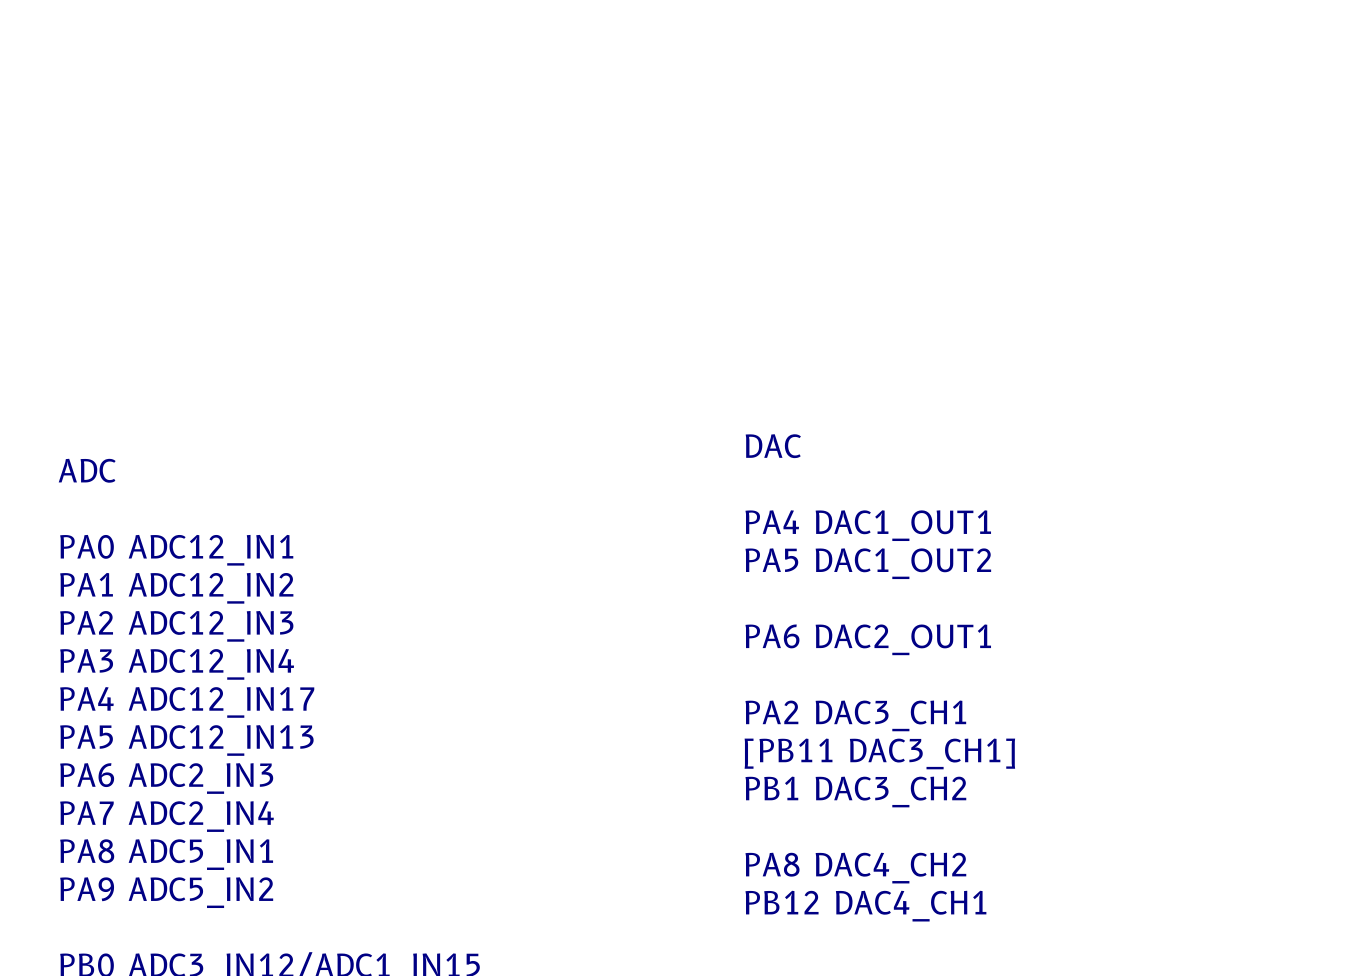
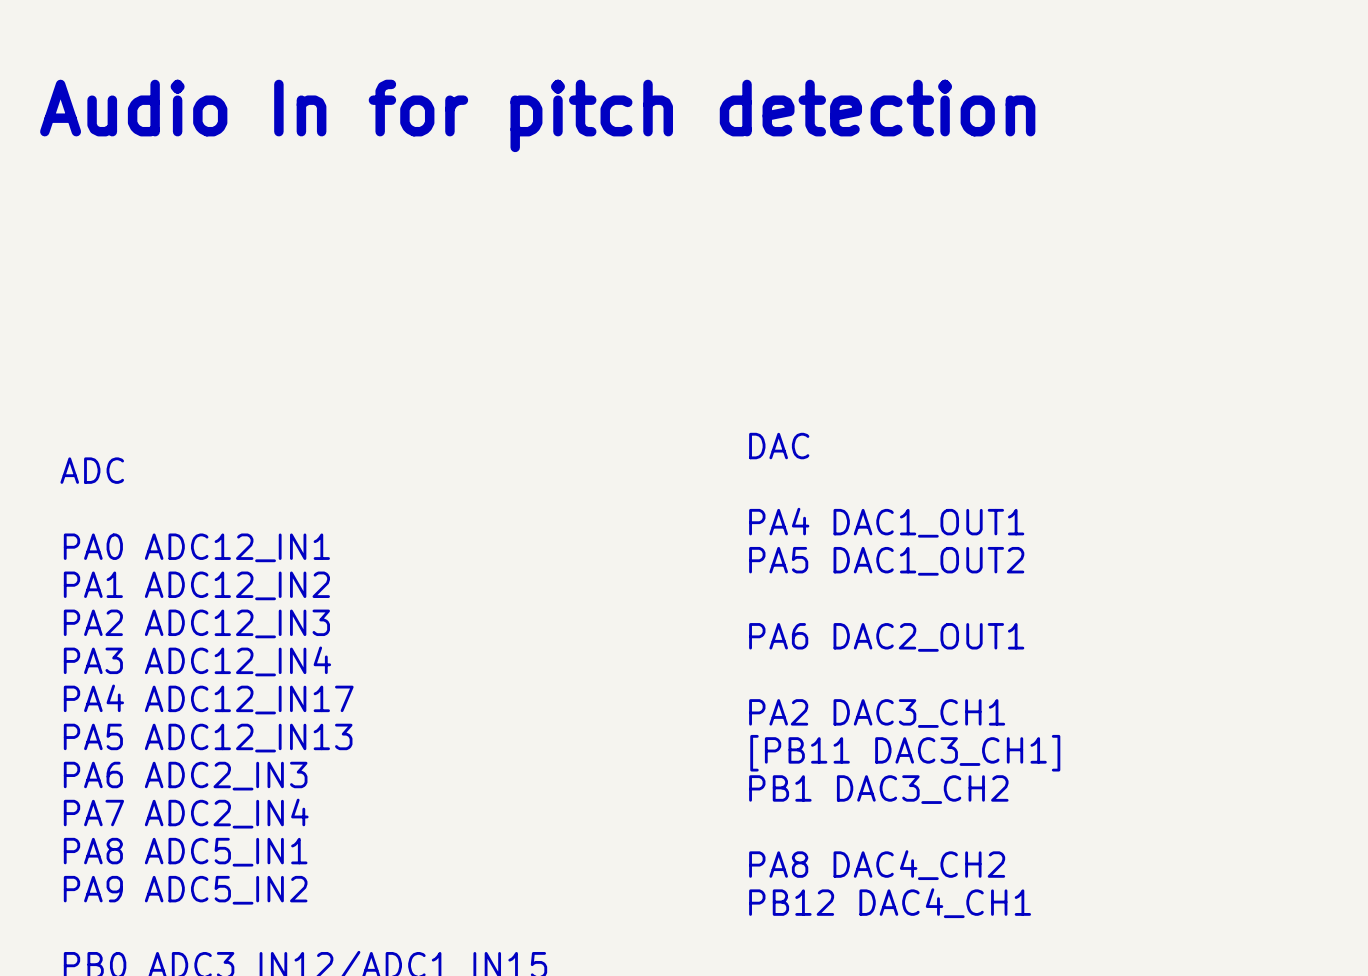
text: none -> Audio In for pitch detection (537, 115)

